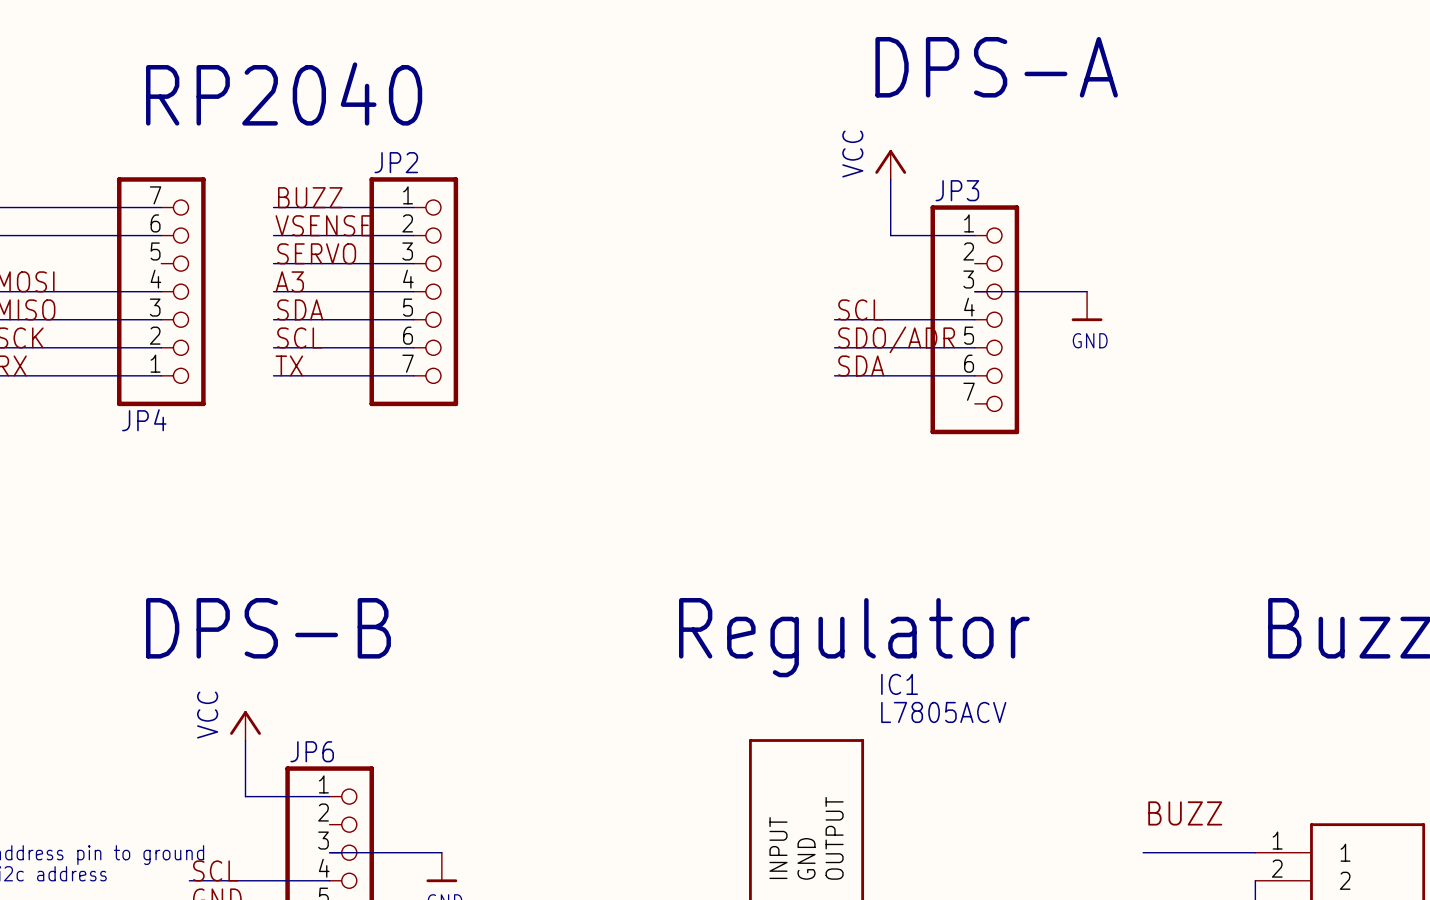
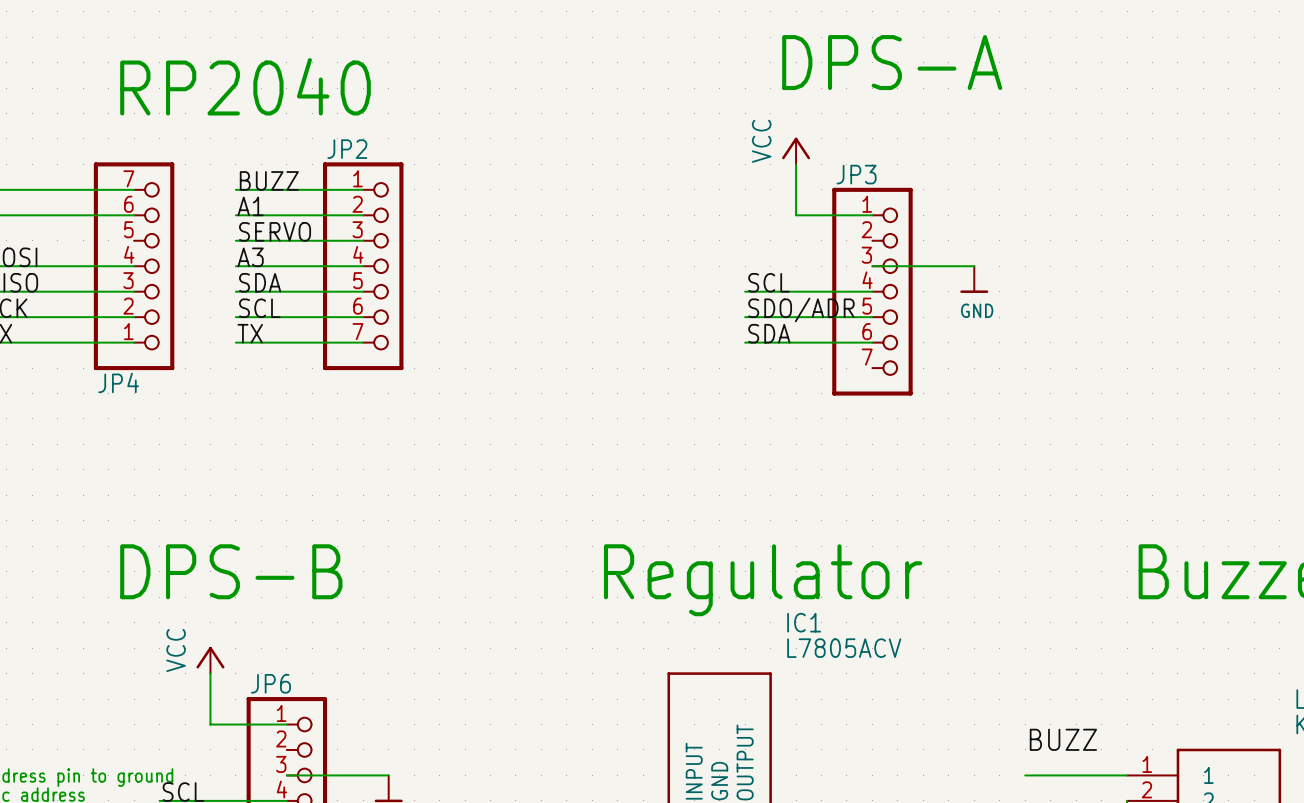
label: VSENSE (323, 225) -> A1 (250, 206)

